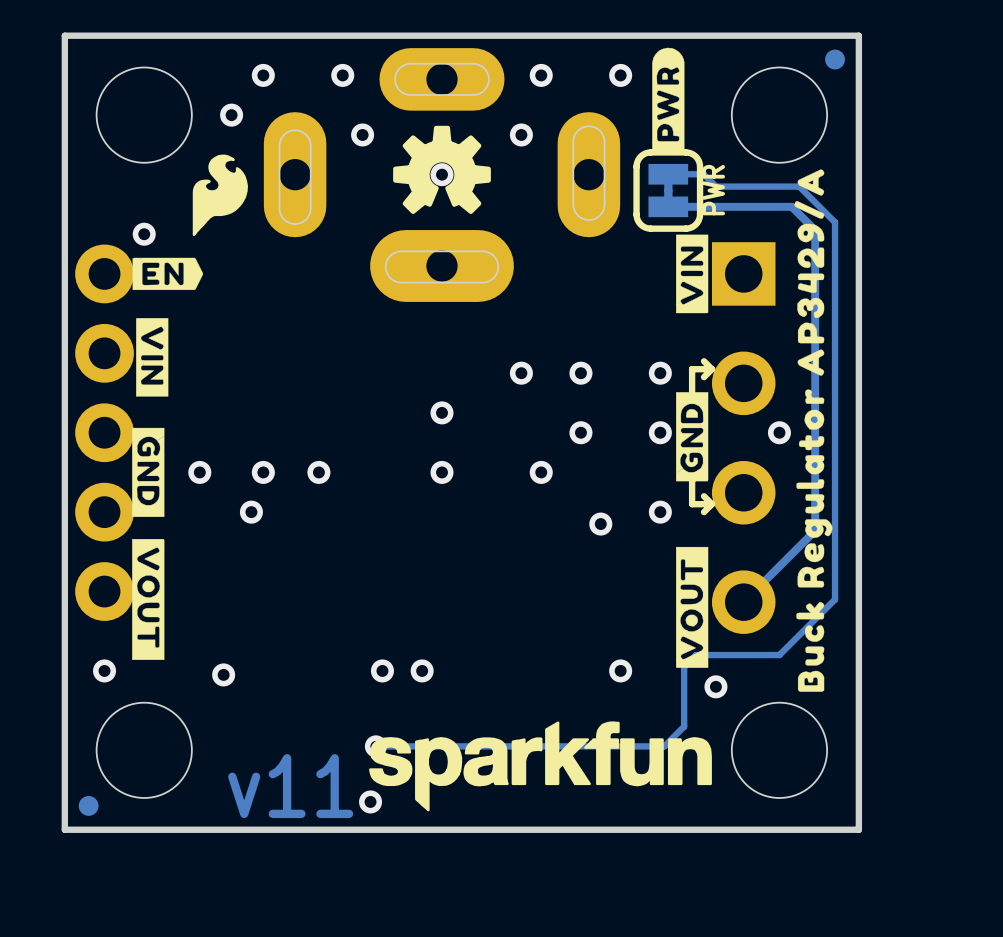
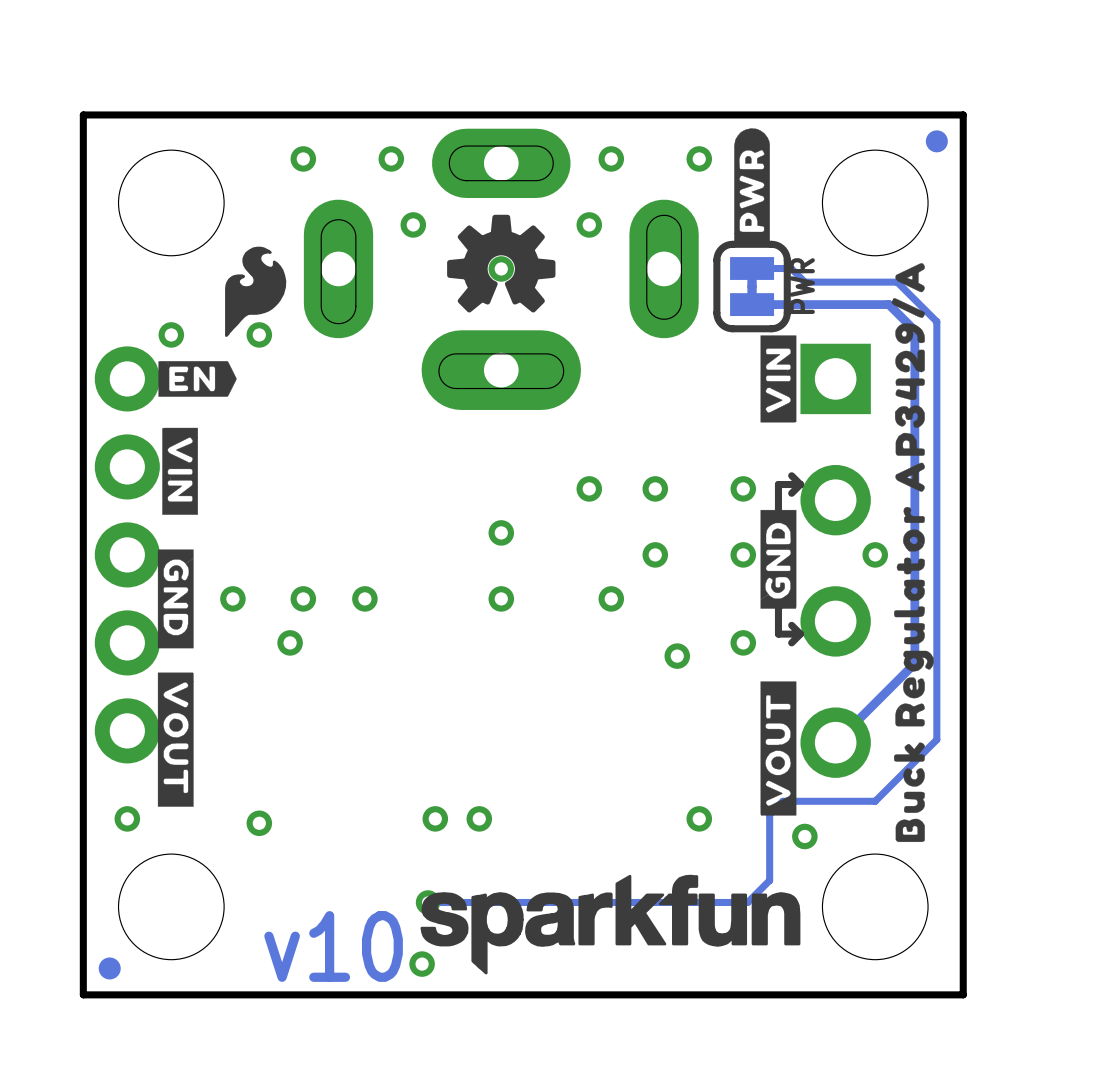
via position: (231, 115) -> (259, 334)
text: v11 (290, 786) -> v10 (333, 946)

